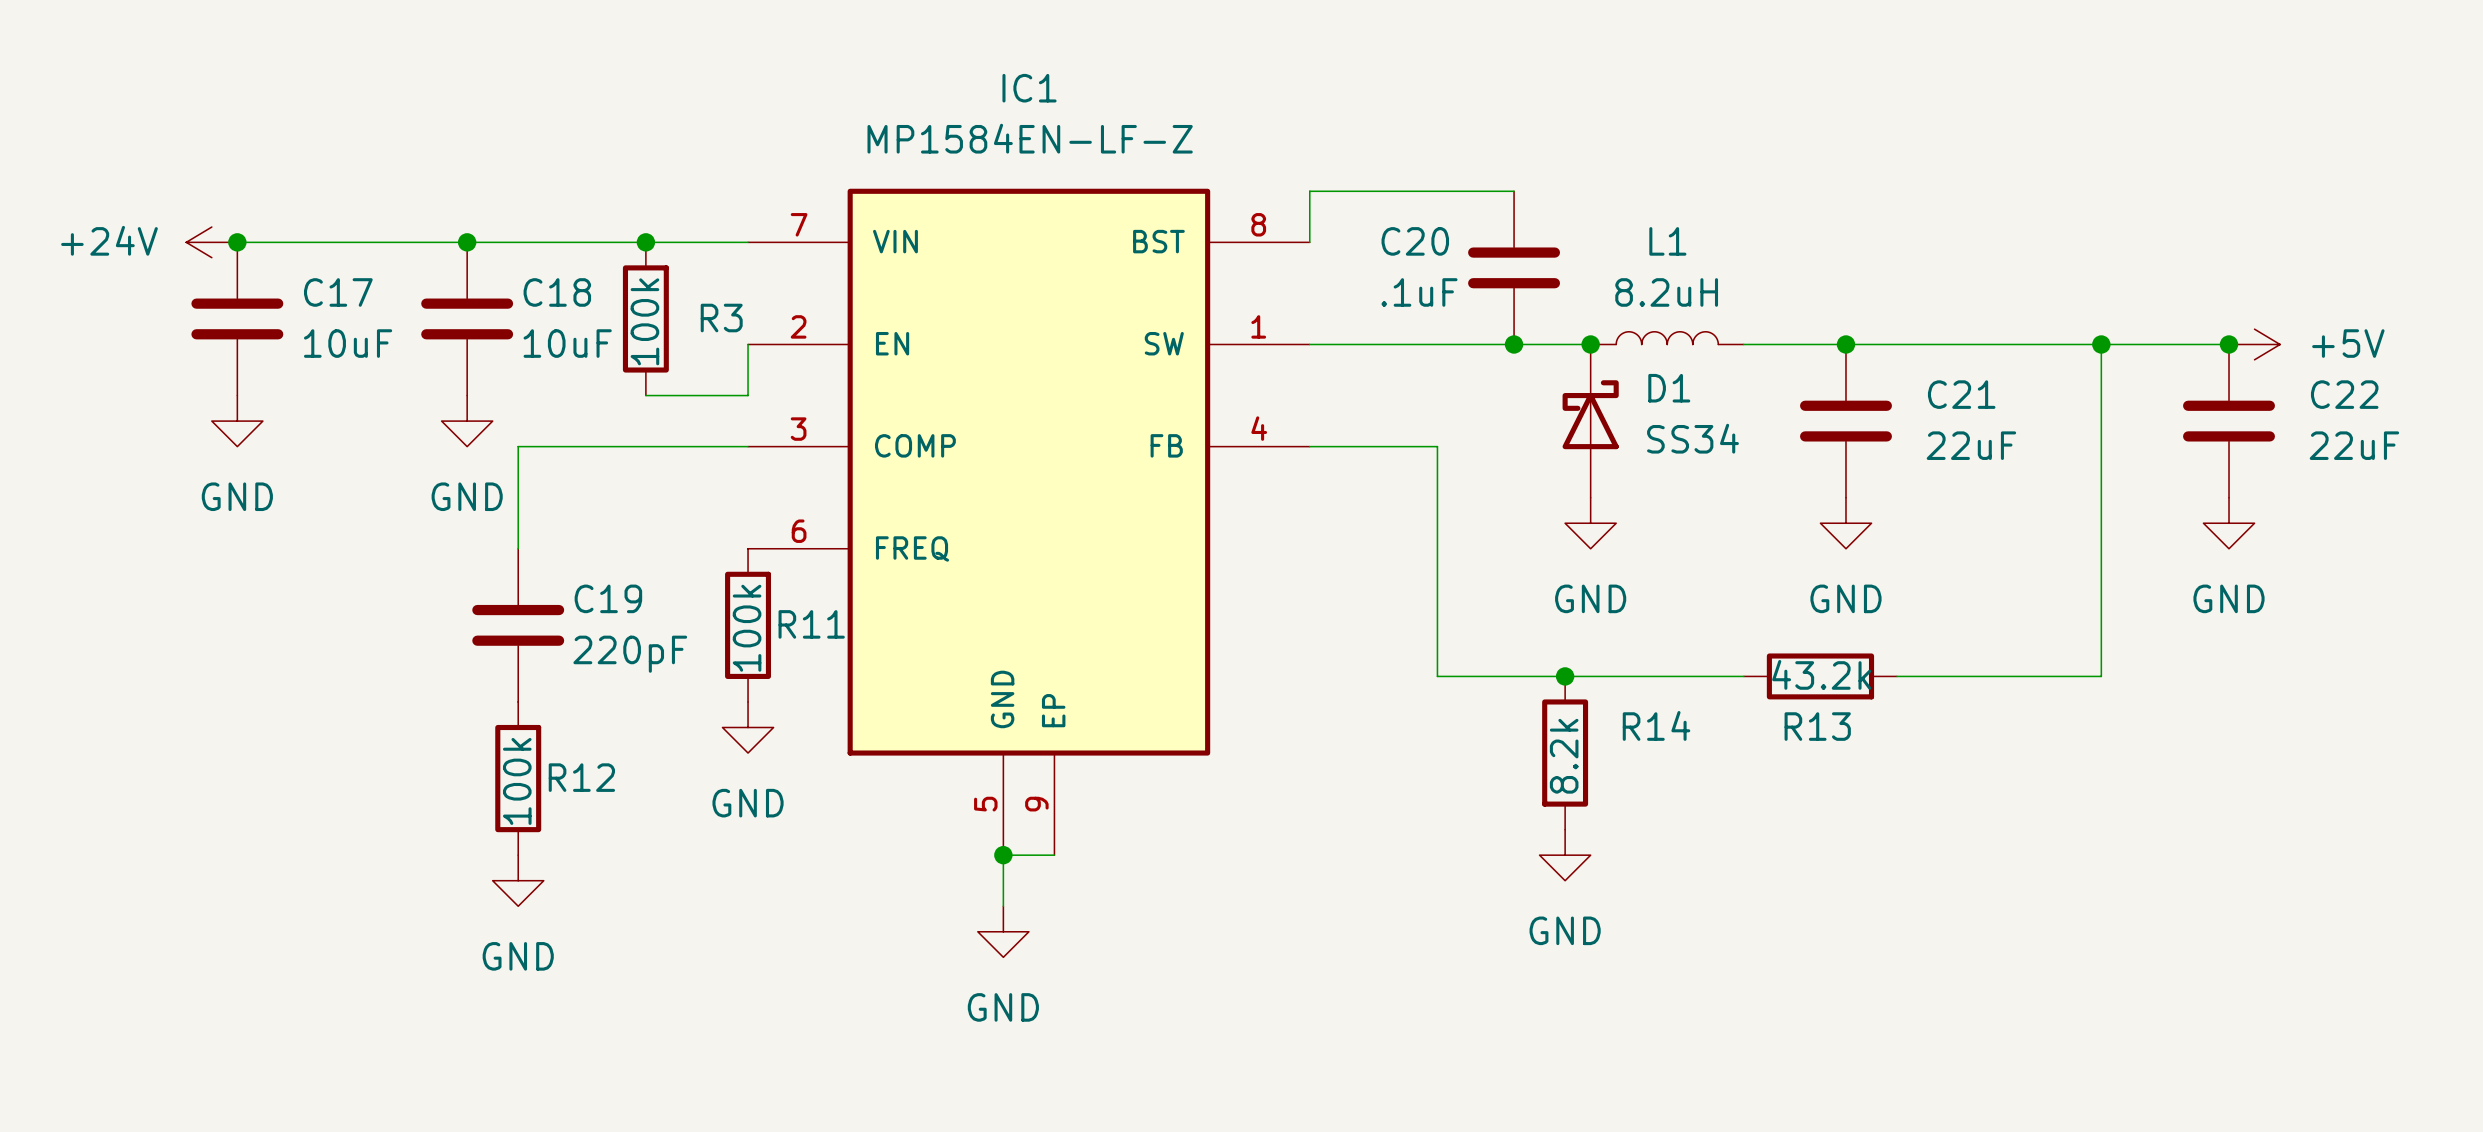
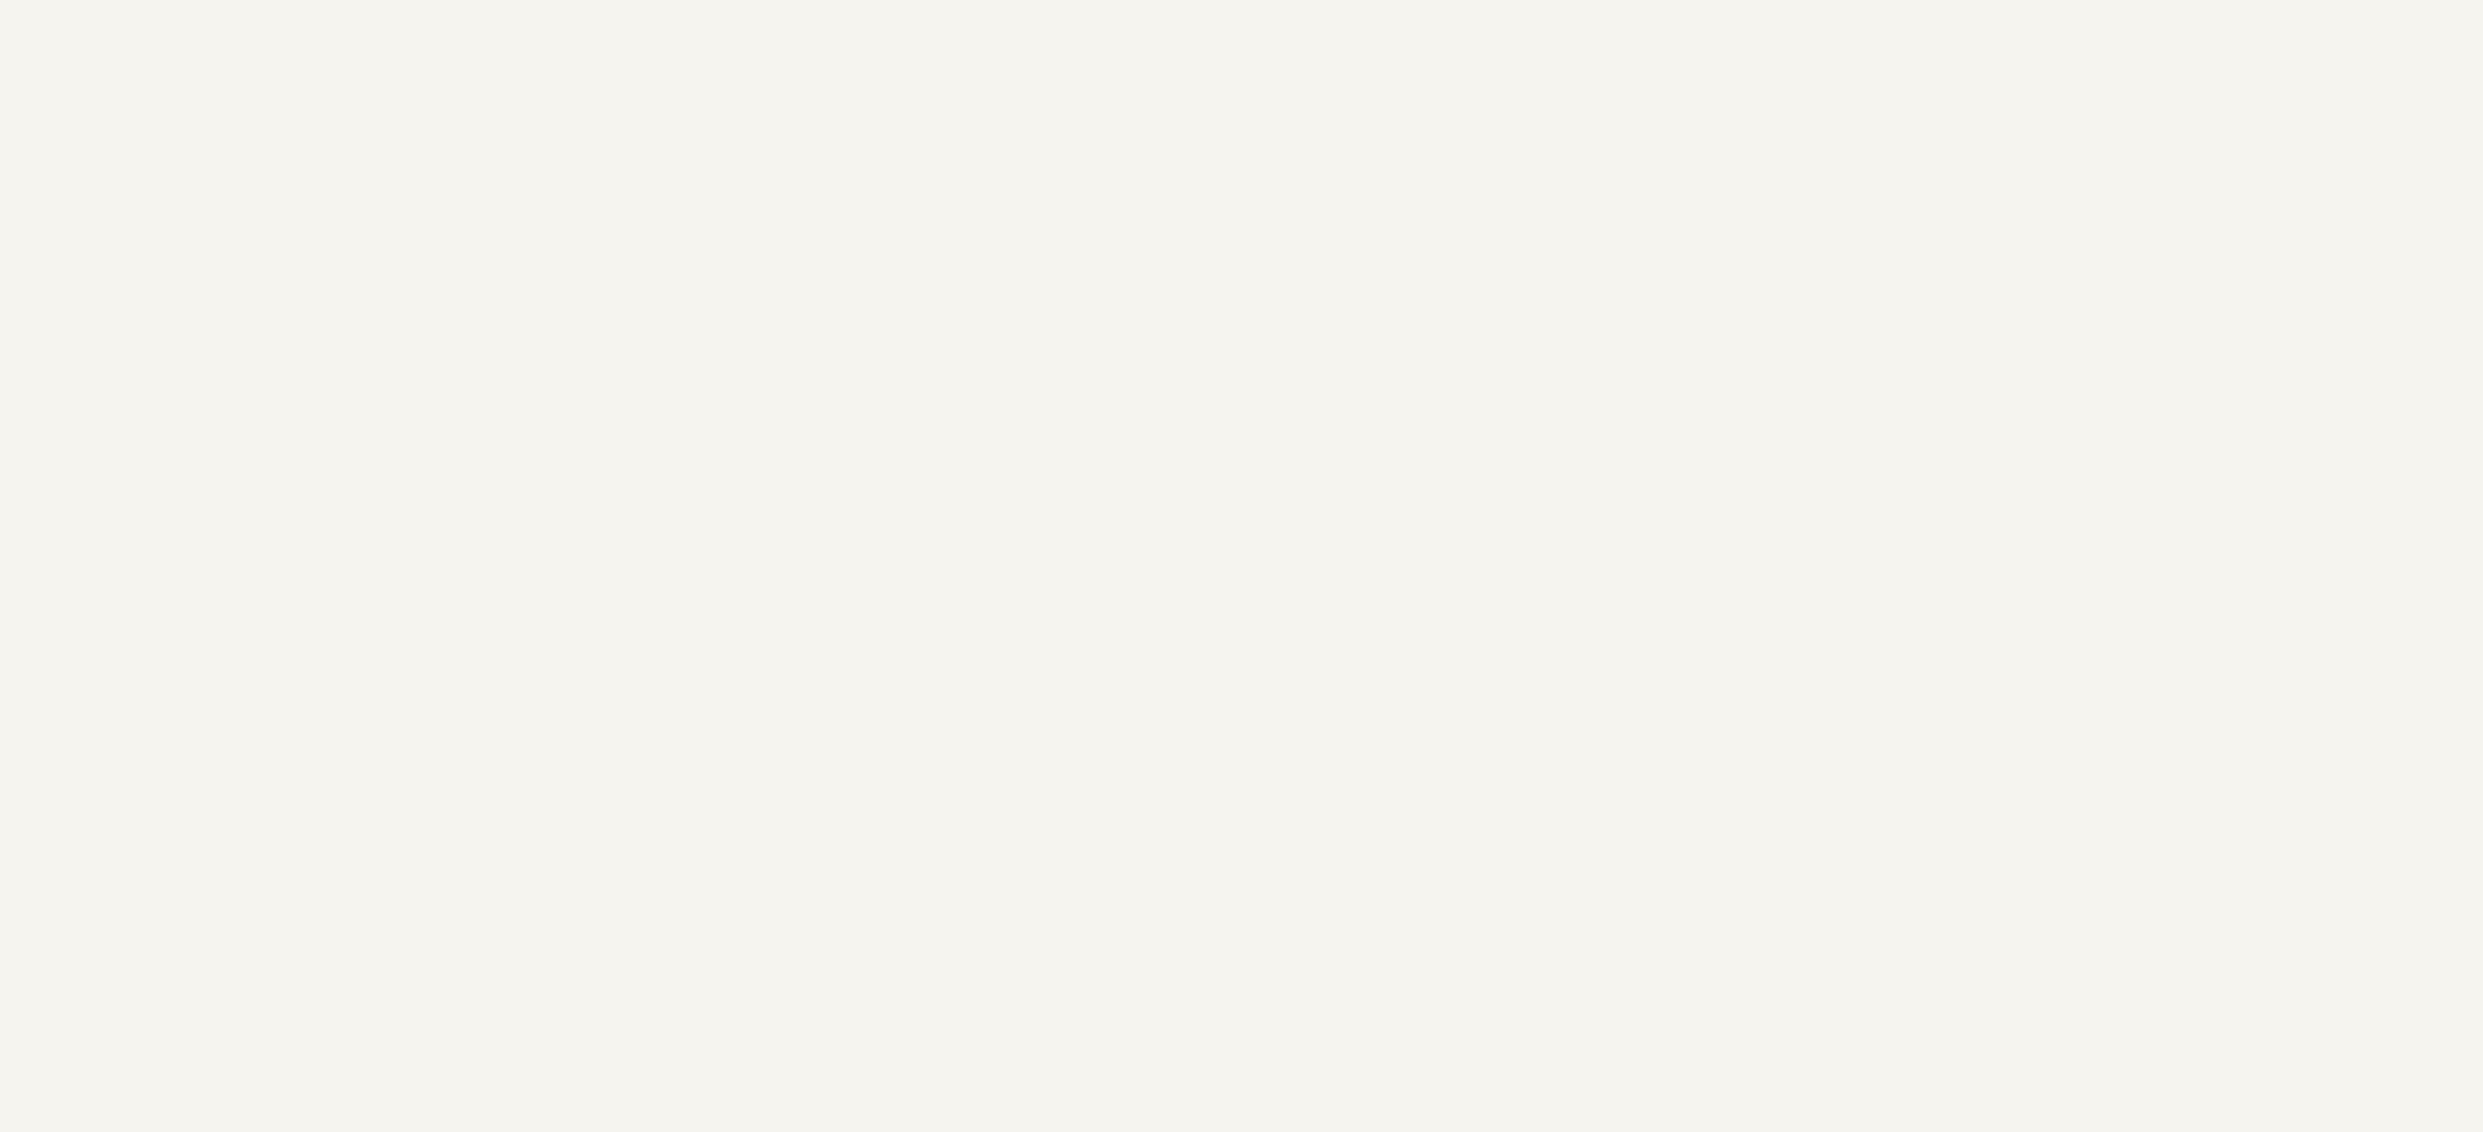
wire: (1514, 191) (1309, 191) (1309, 242) -> none
power symbol: +24V (211, 242) -> none
wire: (237, 242) (748, 242) -> none
junction: (237, 242) -> none
junction: (467, 242) -> none
junction: (645, 242) -> none
C20: .1uF (1514, 267) -> none
C17: 10uF (237, 318) -> none
C18: 10uF (467, 318) -> none
R3: 100k (645, 318) -> none
L1: 8.2uH (1667, 338) -> none
wire: (748, 344) (748, 395) (645, 395) -> none
wire: (1309, 344) (1590, 344) -> none
junction: (1514, 344) -> none
junction: (1590, 344) -> none
wire: (1743, 344) (2229, 344) -> none
junction: (1845, 344) -> none
wire: (2101, 344) (2101, 676) (1897, 676) -> none
junction: (2101, 344) -> none
junction: (2229, 344) -> none
power symbol: +5V (2254, 344) -> none
power symbol: GND (237, 421) -> none
power symbol: GND (467, 421) -> none
D1: SS34 (1590, 421) -> none
C21: 22uF (1845, 421) -> none
C22: 22uF (2229, 421) -> none
wire: (748, 446) (518, 446) (518, 548) -> none
wire: (1309, 446) (1437, 446) (1437, 676) (1743, 676) -> none
IC1: MP1584EN-LF-Z (1028, 521) -> none
power symbol: GND (1590, 523) -> none
power symbol: GND (1845, 523) -> none
power symbol: GND (2229, 523) -> none
C19: 220pF (518, 625) -> none
R11: 100k (748, 625) -> none
junction: (1565, 676) -> none
R13: 43.2k (1820, 676) -> none
power symbol: GND (748, 727) -> none
R14: 8.2k (1565, 753) -> none
R12: 100k (518, 778) -> none
junction: (1003, 855) -> none
wire: (1054, 855) (1003, 855) (1003, 906) -> none
power symbol: GND (1565, 855) -> none
power symbol: GND (518, 880) -> none
power symbol: GND (1003, 931) -> none

